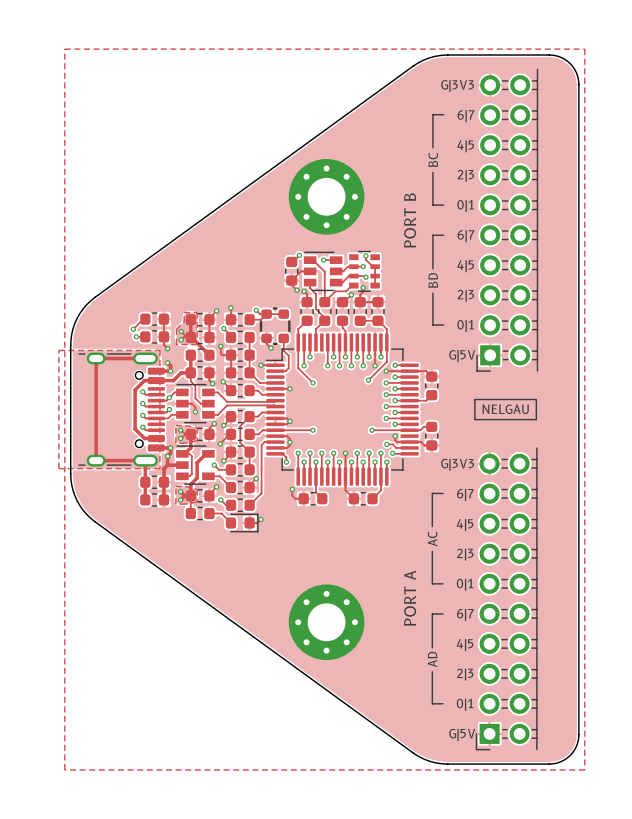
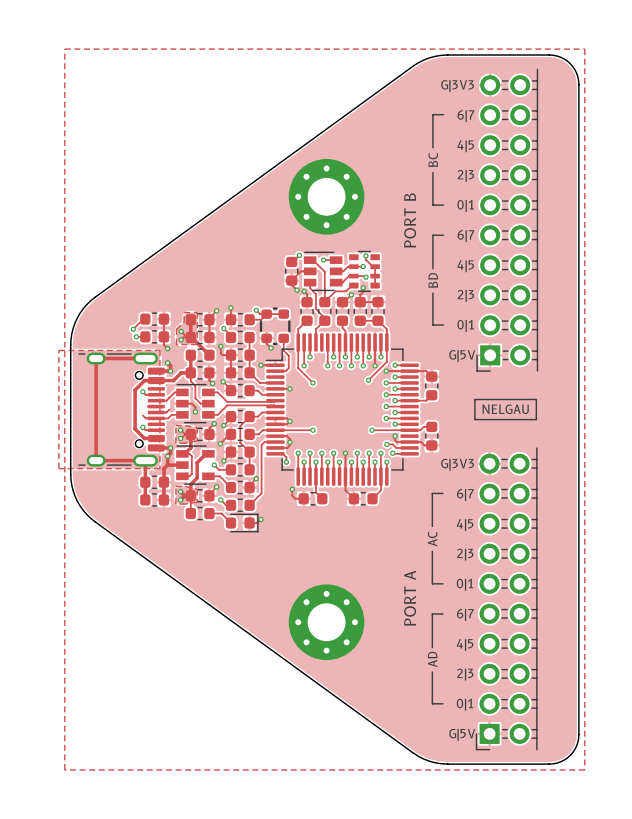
via: (169, 397) -> none
track: (142, 403) (147, 406) -> none
via: (142, 403) -> none
via: (169, 409) -> none
via: (142, 415) -> none

